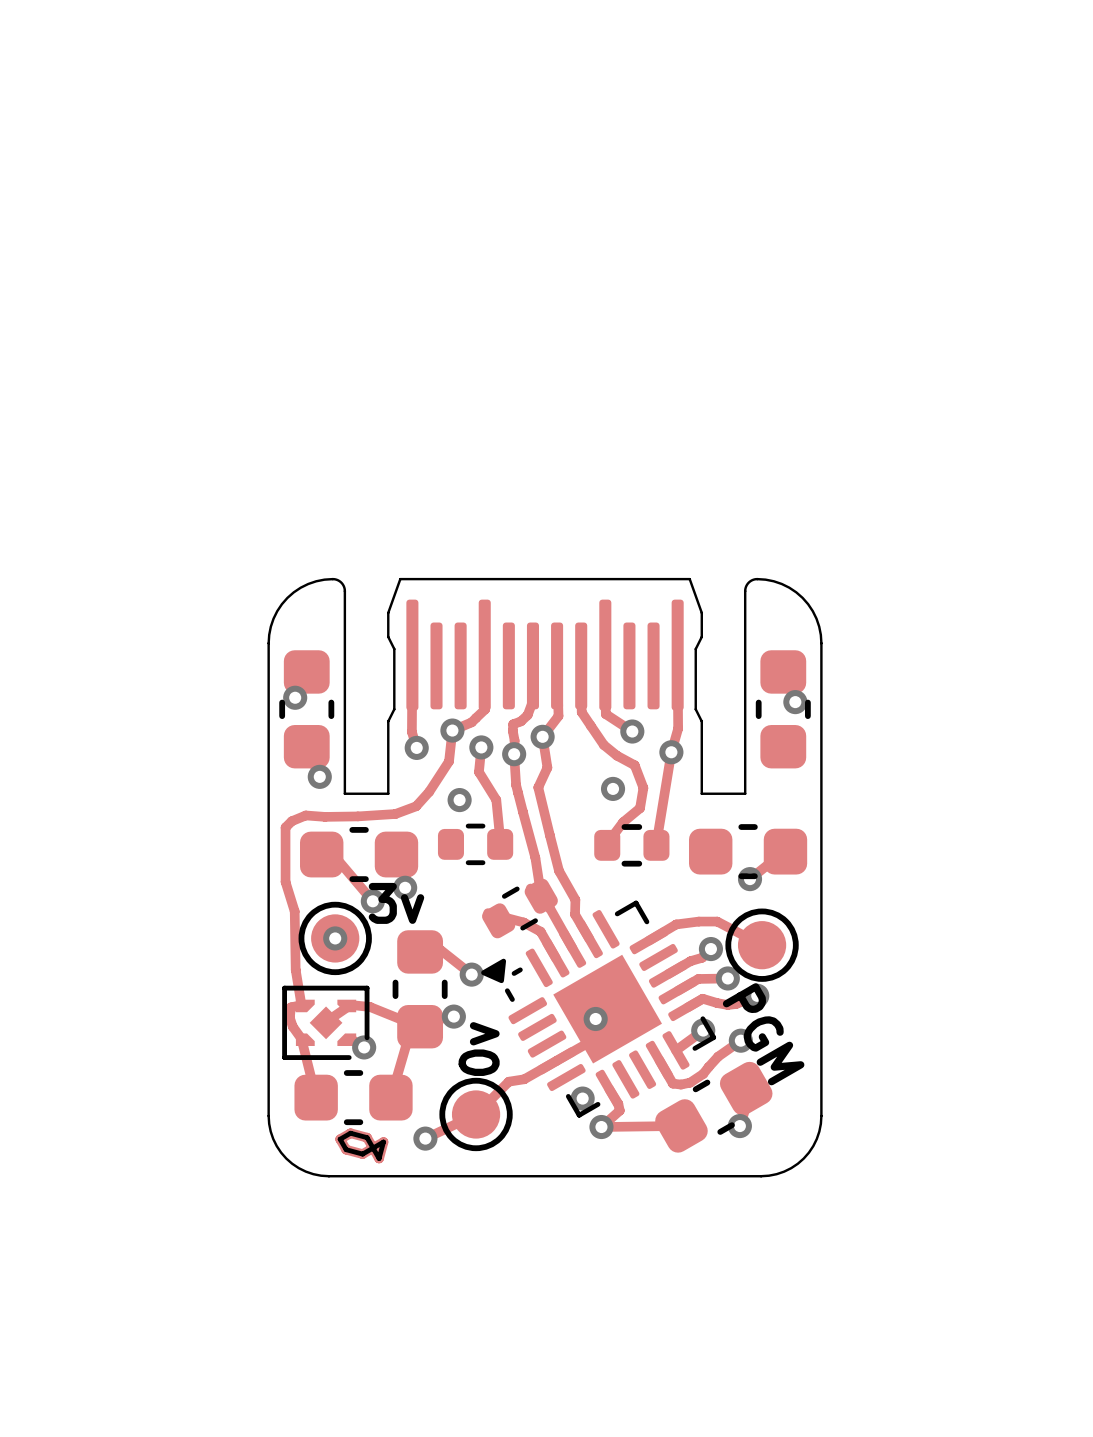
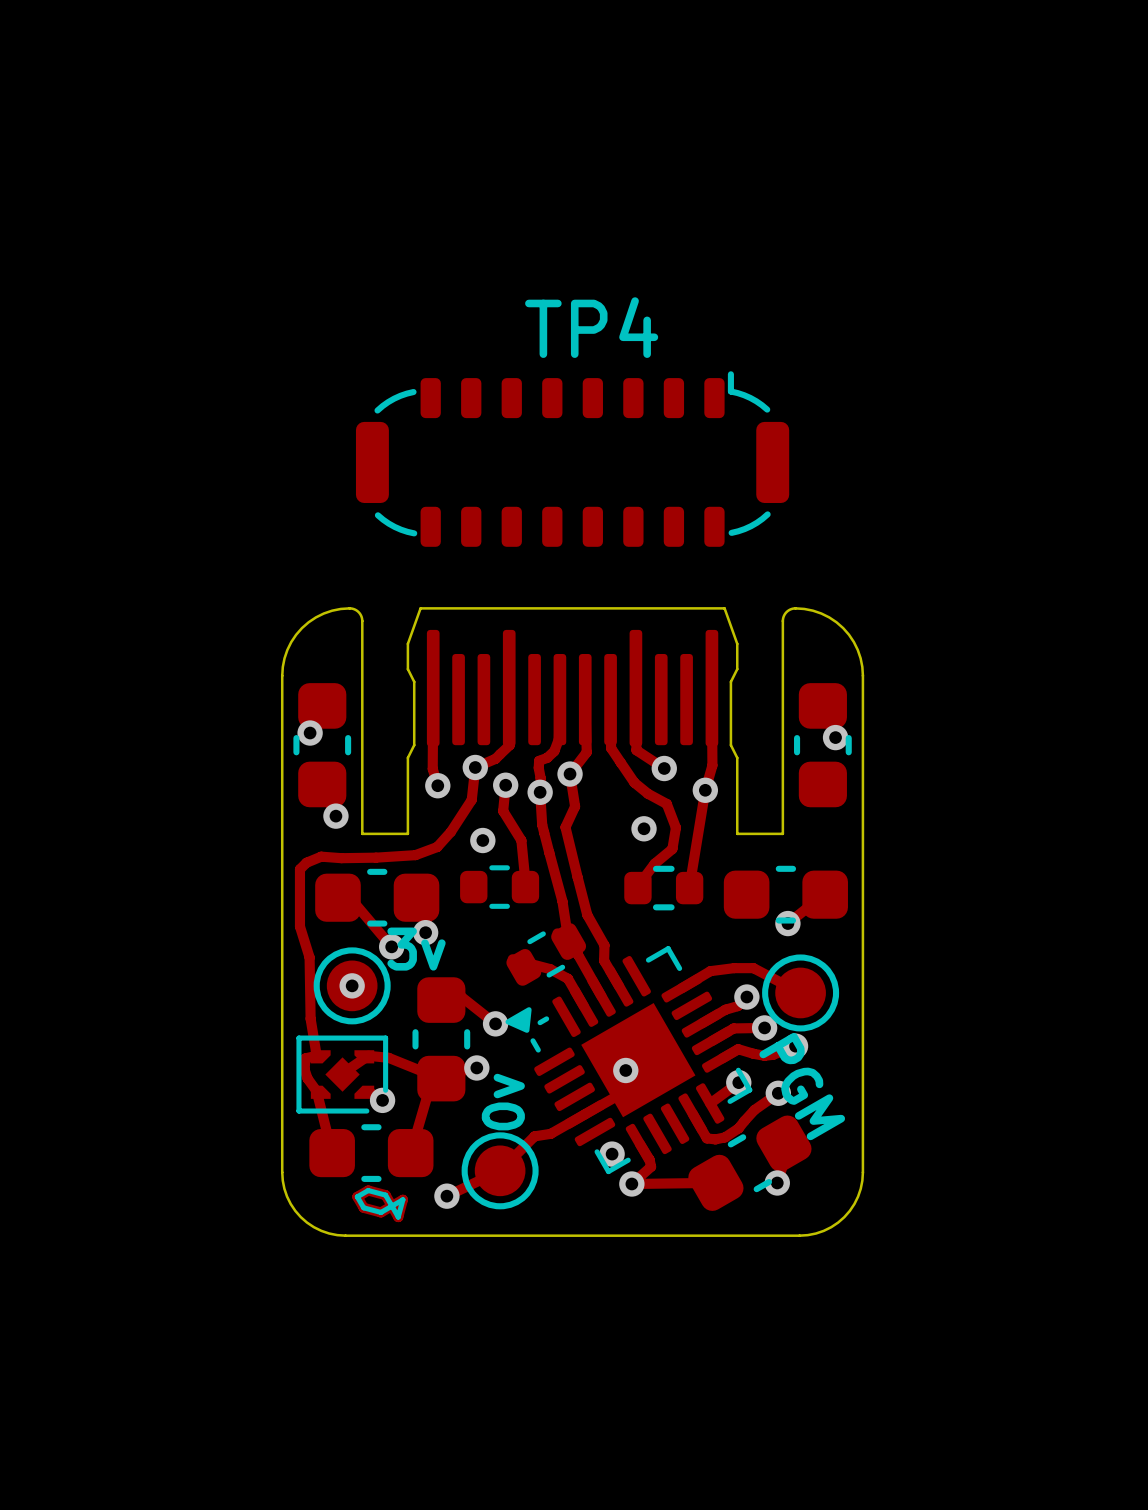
TP4: none -> (572, 459)

